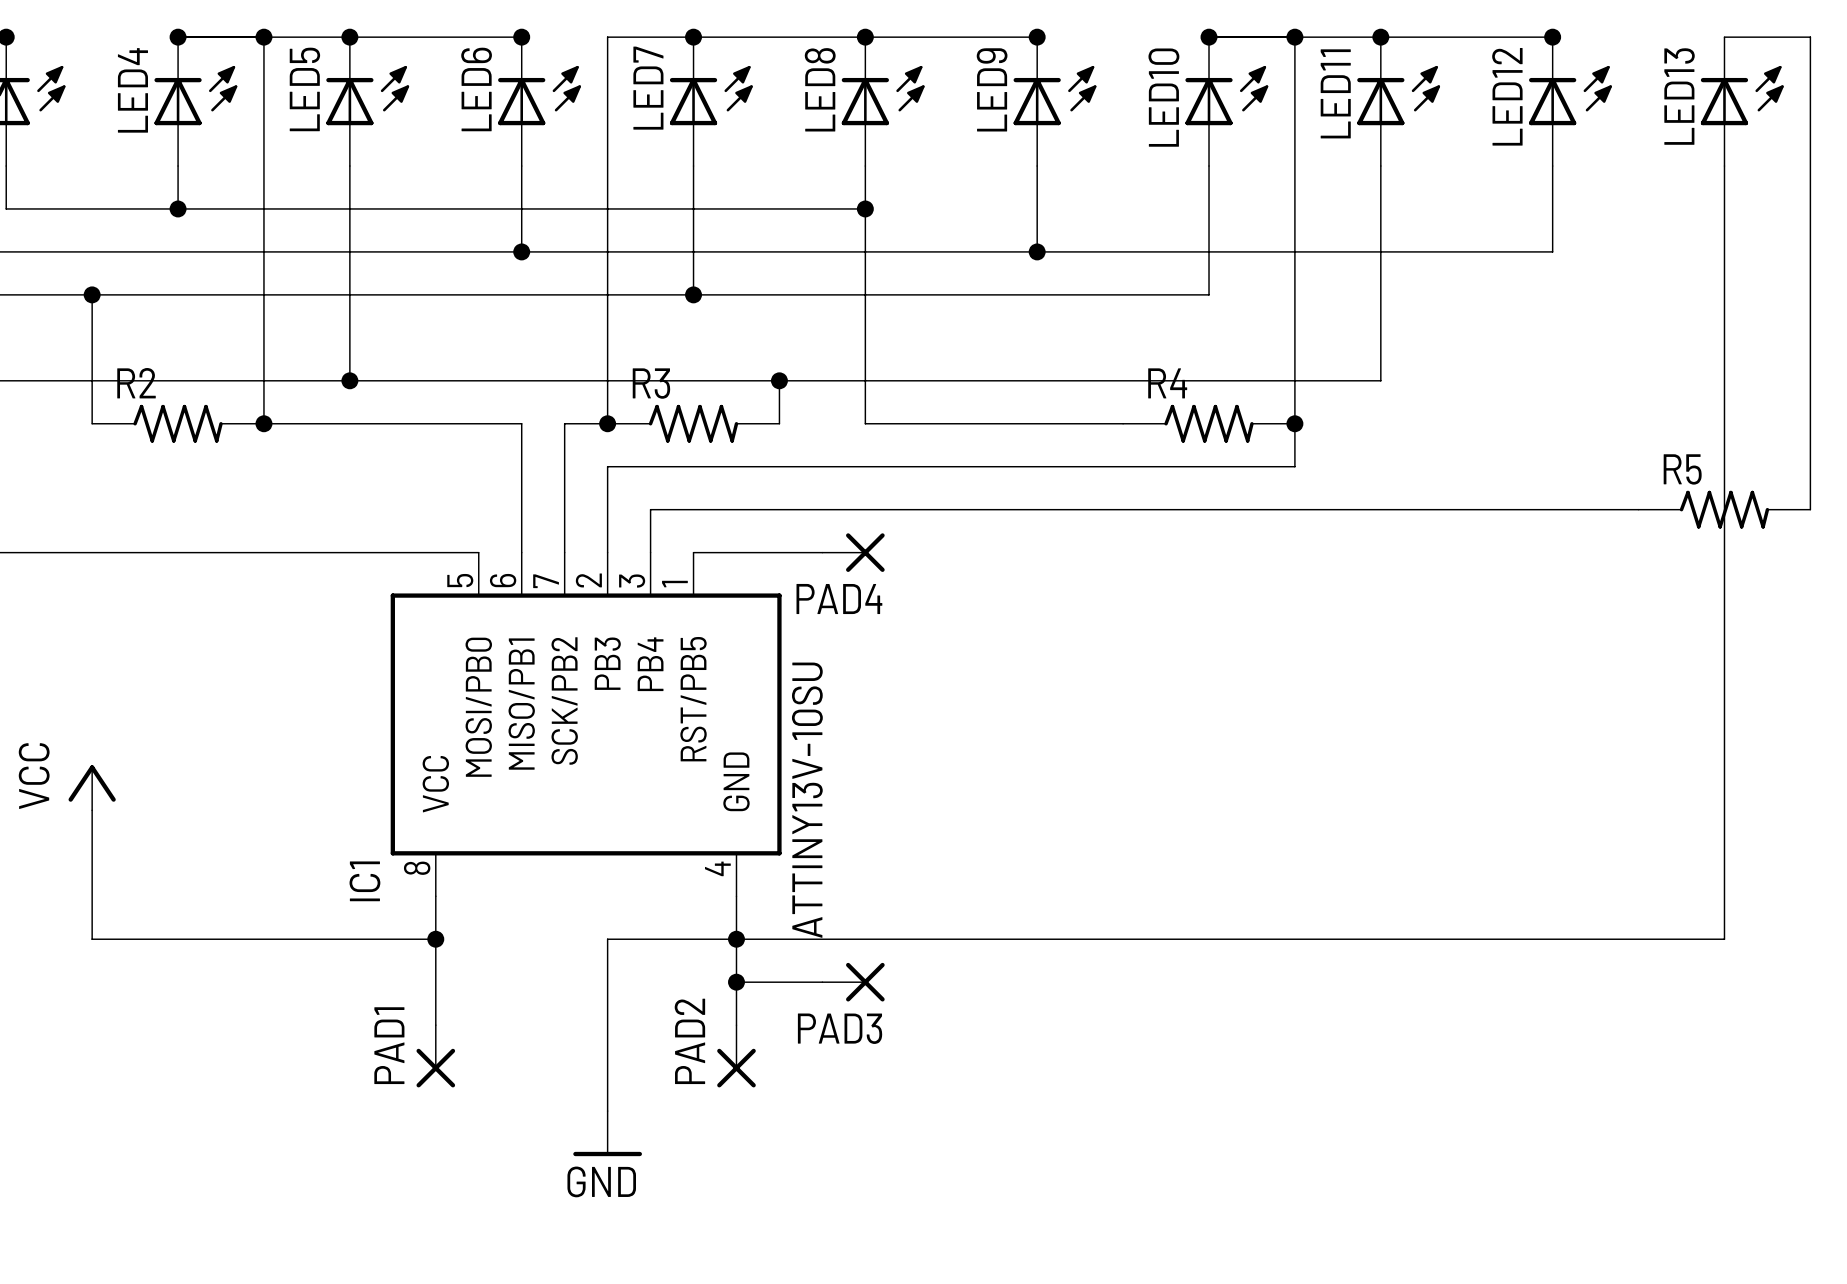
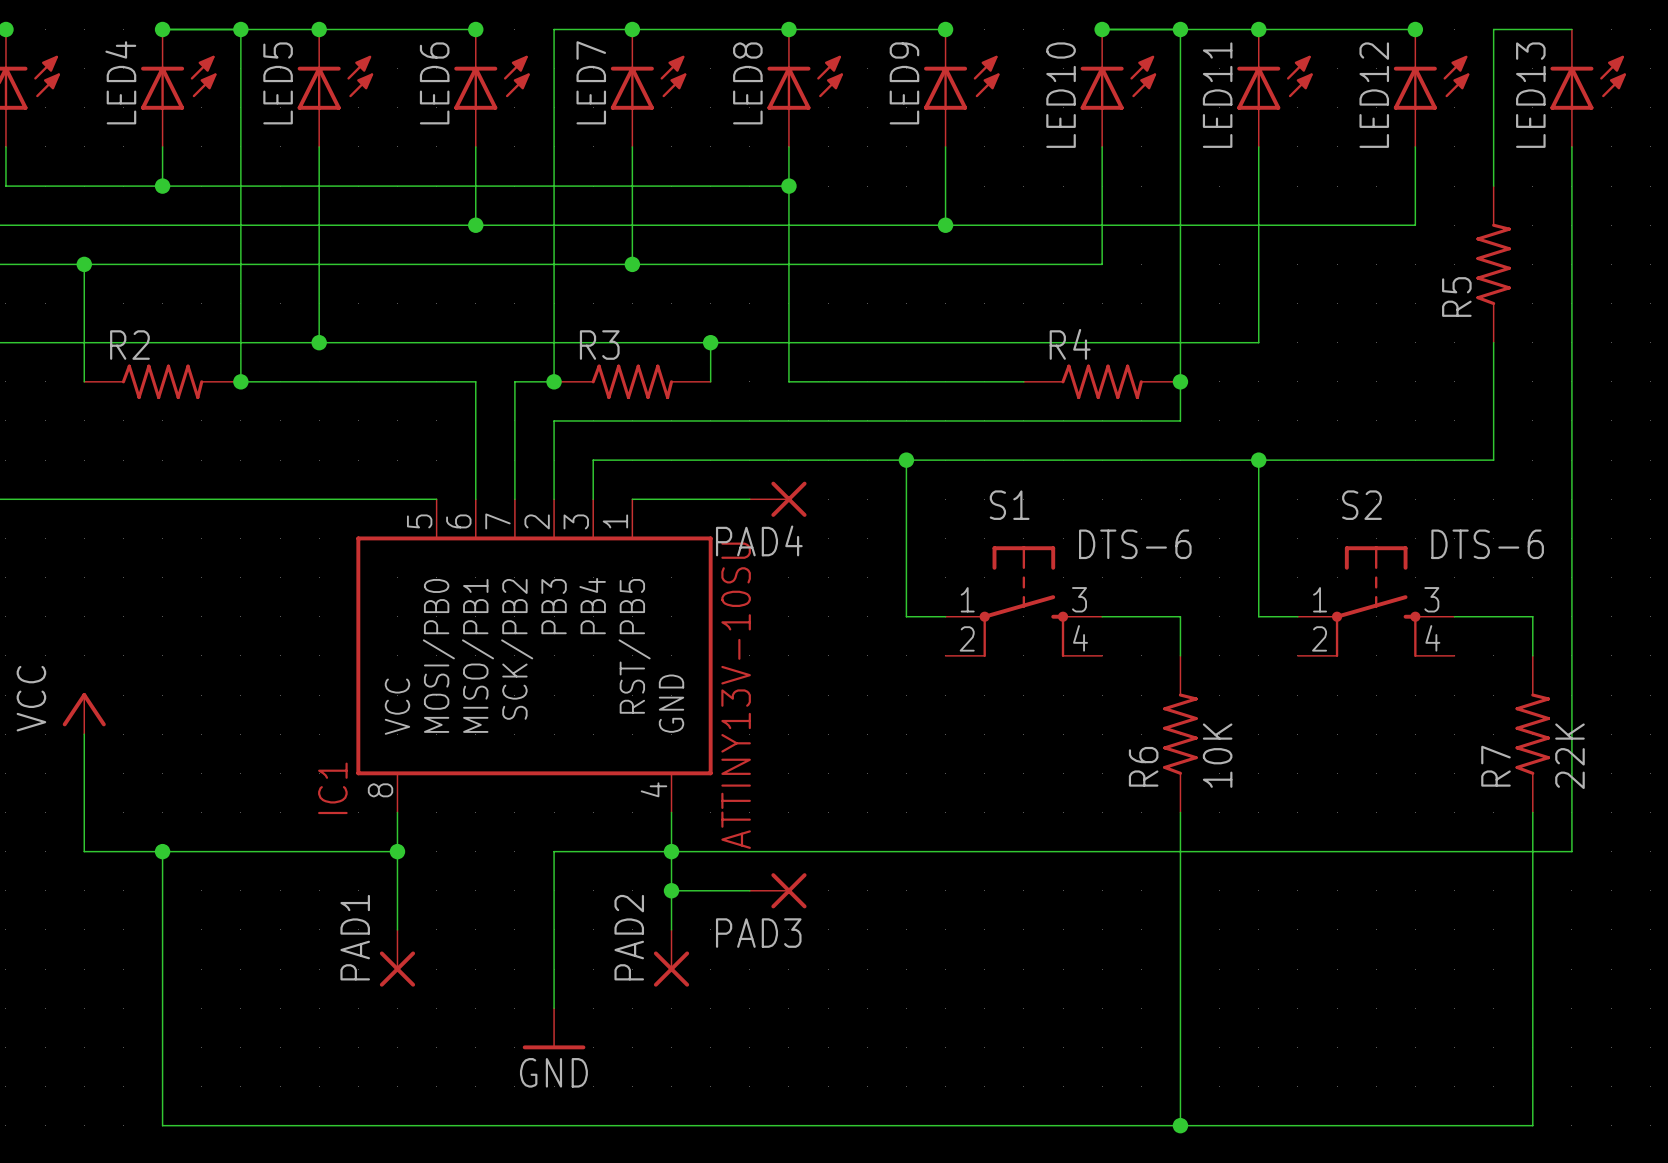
wire: (1724, 37) (1810, 37) (1810, 509) -> (1571, 29) (1493, 29) (1493, 186)
wire: none -> (1493, 342) (1493, 460)
wire: none -> (906, 460) (906, 616) (945, 616)
junction: none -> (906, 460)
wire: none -> (1258, 460) (1258, 616) (1297, 616)
junction: none -> (1258, 460)
R5 rotation: 0° (1724, 509) -> 90° counterclockwise (1493, 264)
R5 position: (1724, 509) -> (1493, 264)
S1: none -> DTS-6 (1023, 601)
S2: none -> DTS-6 (1376, 601)
wire: none -> (1102, 616) (1180, 616) (1180, 655)
wire: none -> (1454, 616) (1532, 616) (1532, 655)
R6: none -> 10K (1180, 734)
R7: none -> 22K (1532, 734)
wire: none -> (1180, 812) (1180, 1125)
wire: none -> (1532, 812) (1532, 1125) (162, 1125) (162, 851)
junction: none -> (162, 851)
junction: none -> (1180, 1125)

